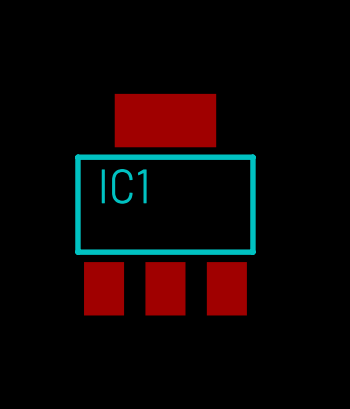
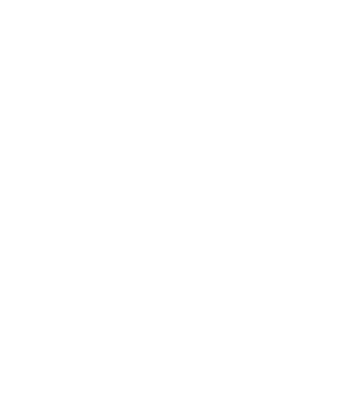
IC1: (165, 204) -> none

